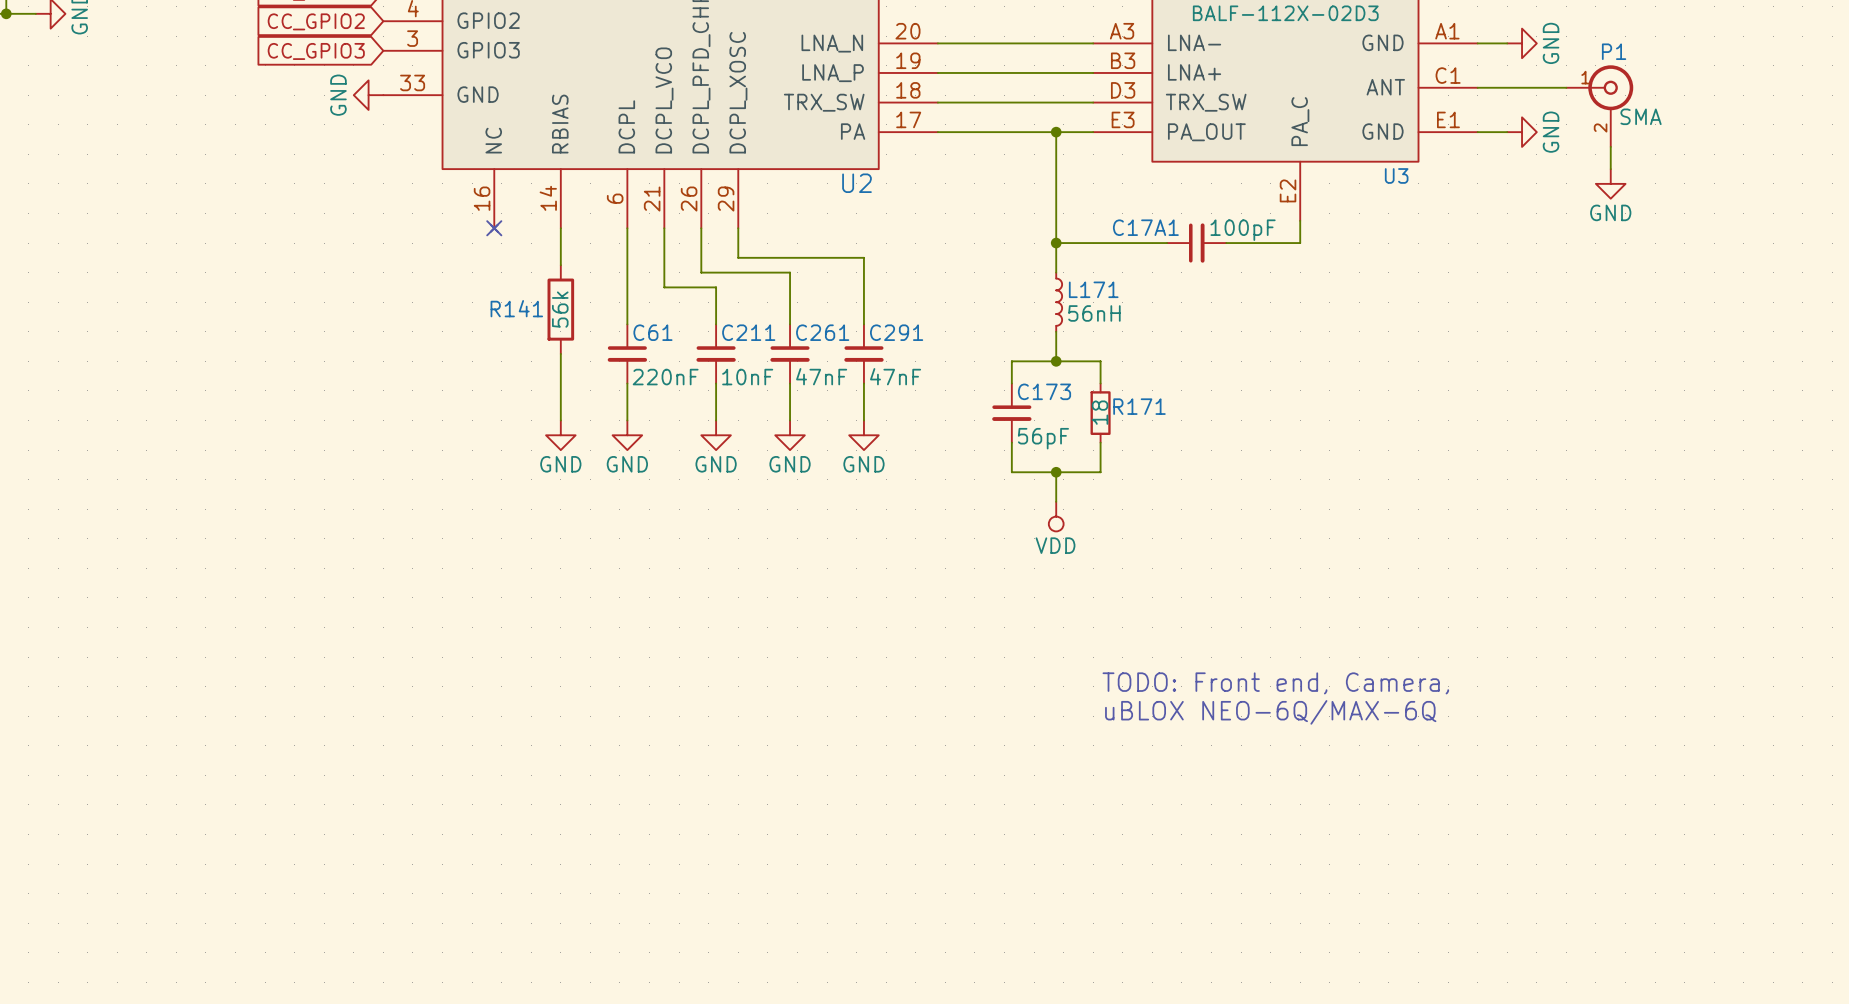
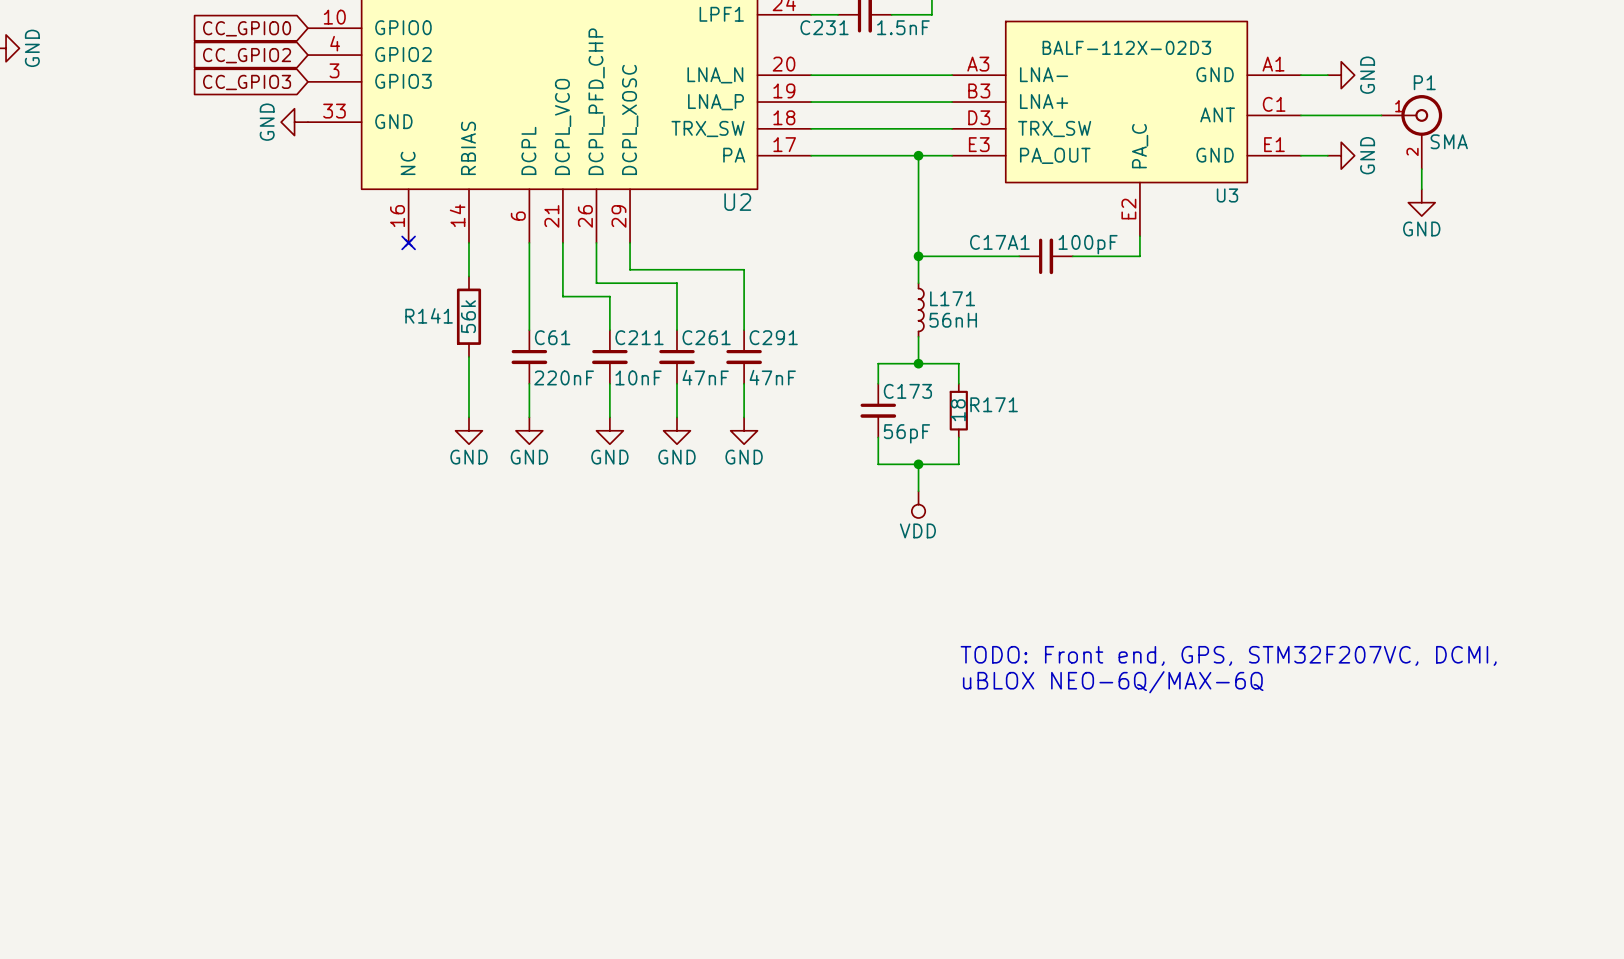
text: TODO: Front end, Camera, (1275, 683) -> TODO: Front end, GPS, STM32F207VC, DCMI, (1228, 655)

